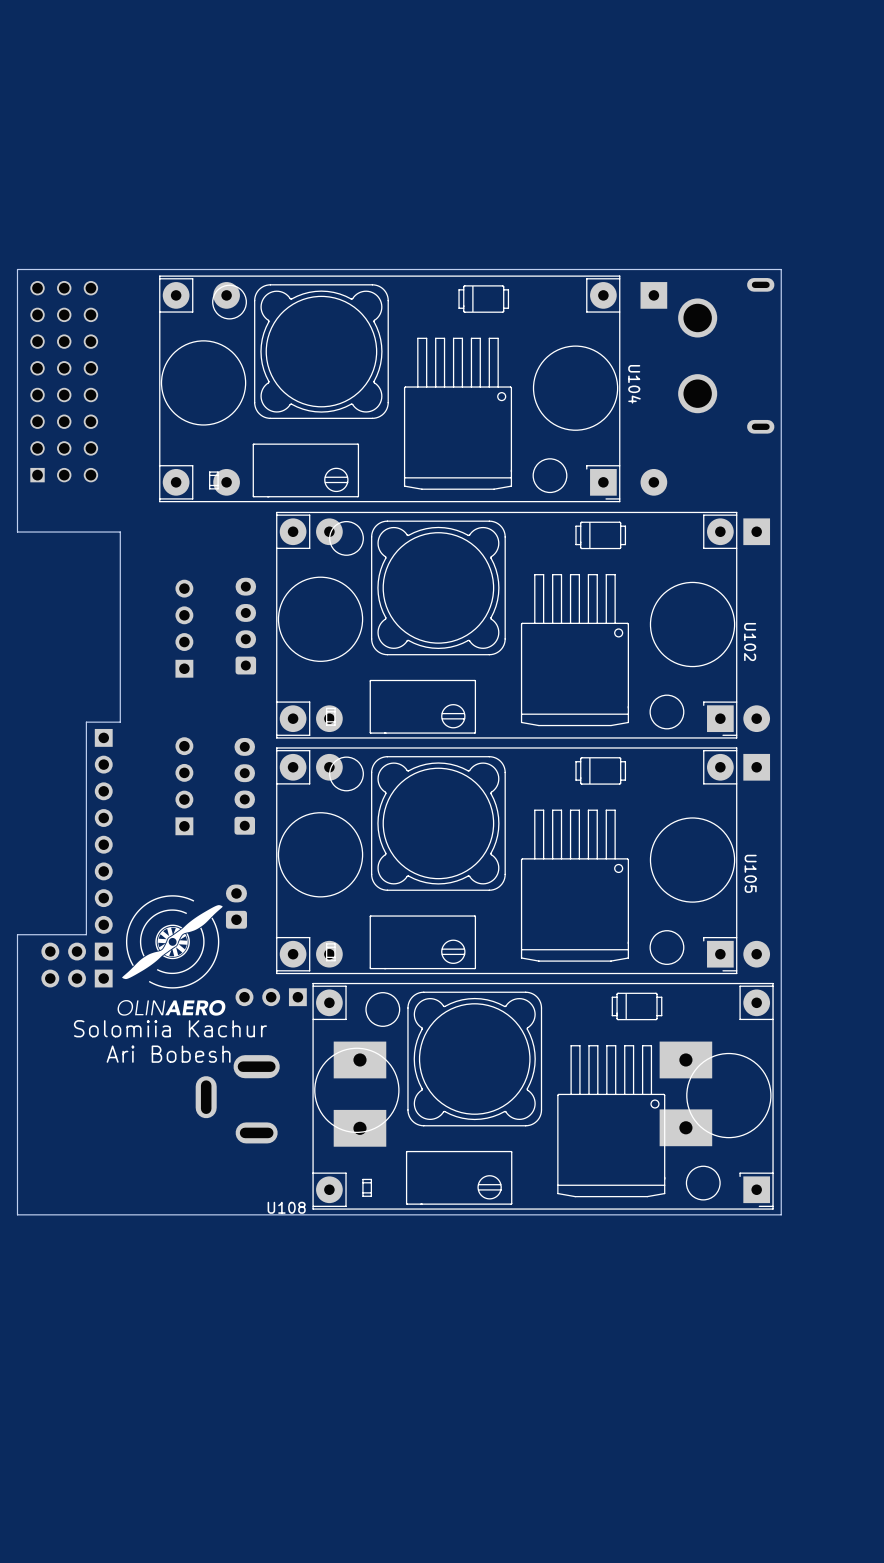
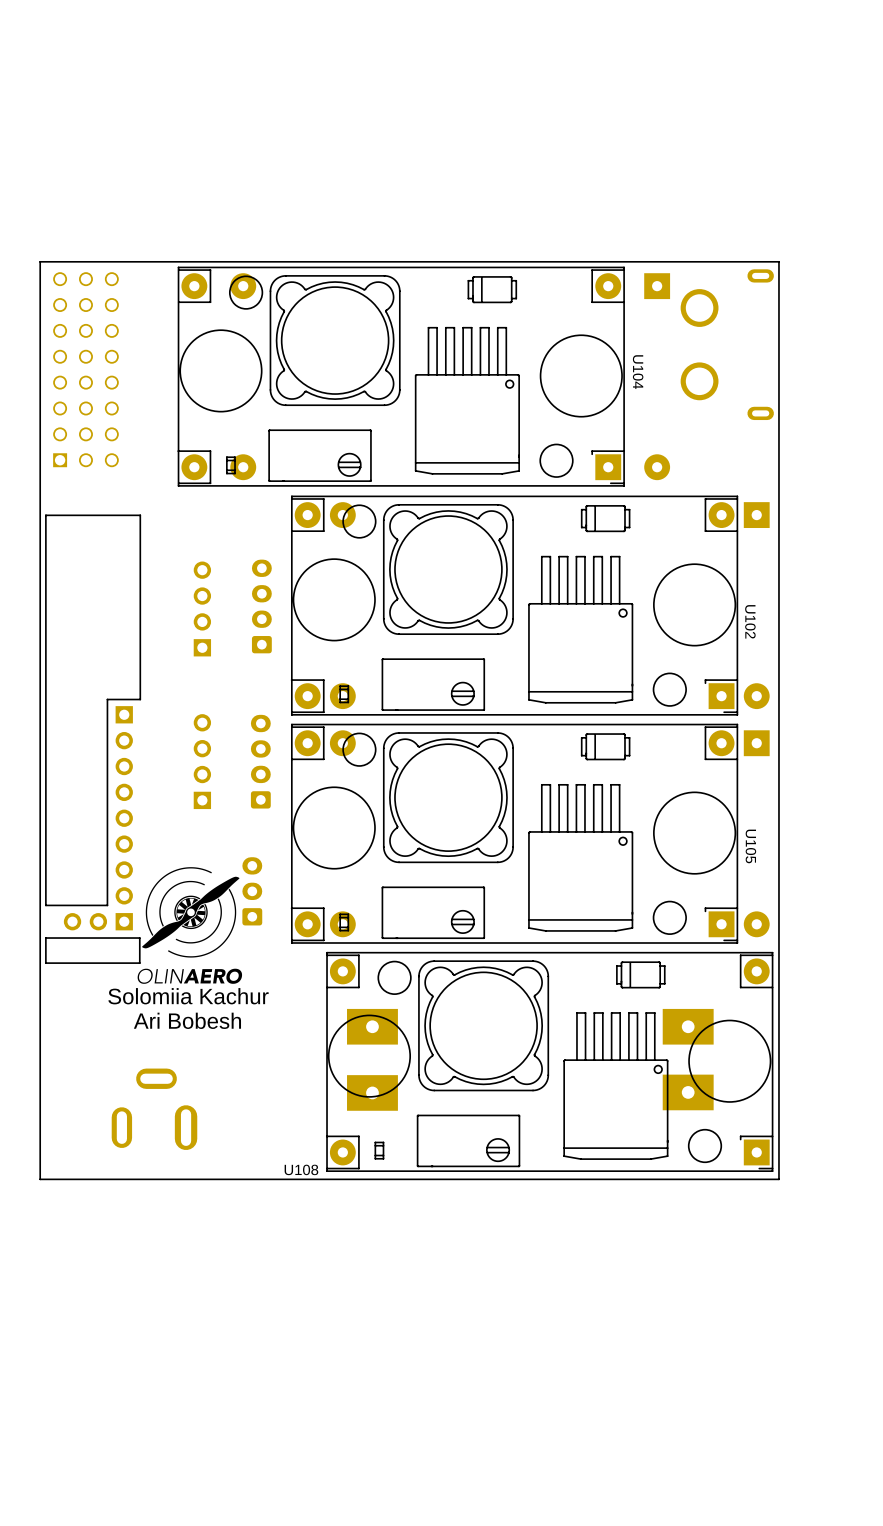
board edge: none -> (778, 261) (40, 261) (40, 1179) (778, 1179) (778, 261)
board edge: (22, 532) (17, 532) (17, 269) (781, 269) (781, 1214) (17, 1214) (17, 934) (22, 934) -> (45, 515) (45, 905)
part: (236, 906) -> none
part: none -> (252, 891)
board edge: none -> (139, 938) (139, 963) (45, 963) (45, 938) (139, 938)
part: (77, 978) -> none
part: (271, 997) -> none
part rotation: 0° (237, 1099) -> 90° clockwise (154, 1109)
part position: (237, 1099) -> (154, 1109)

